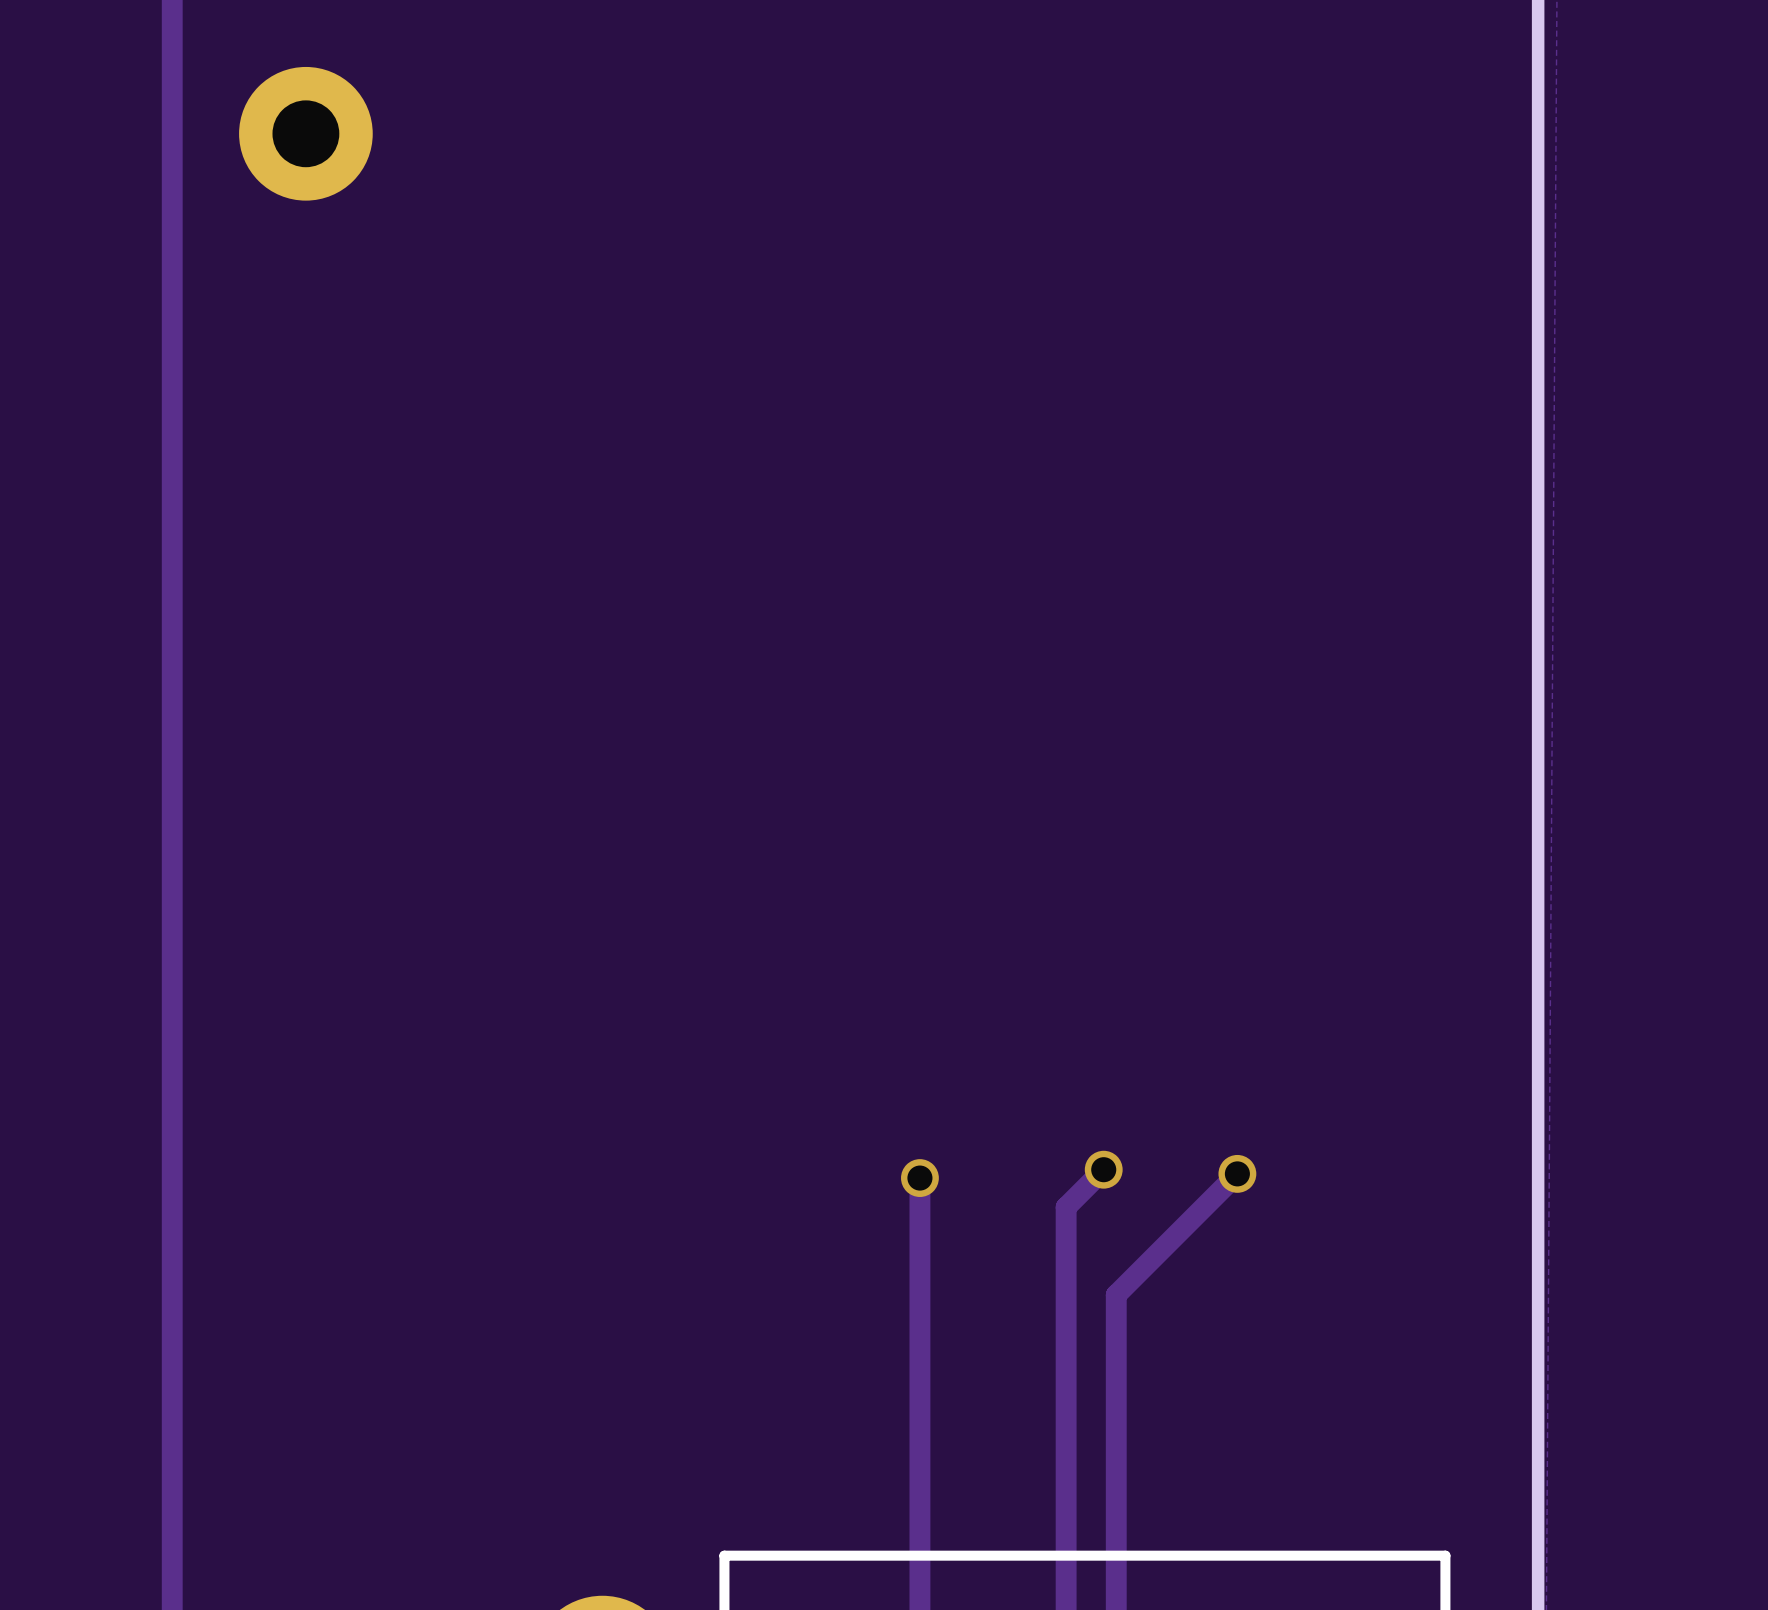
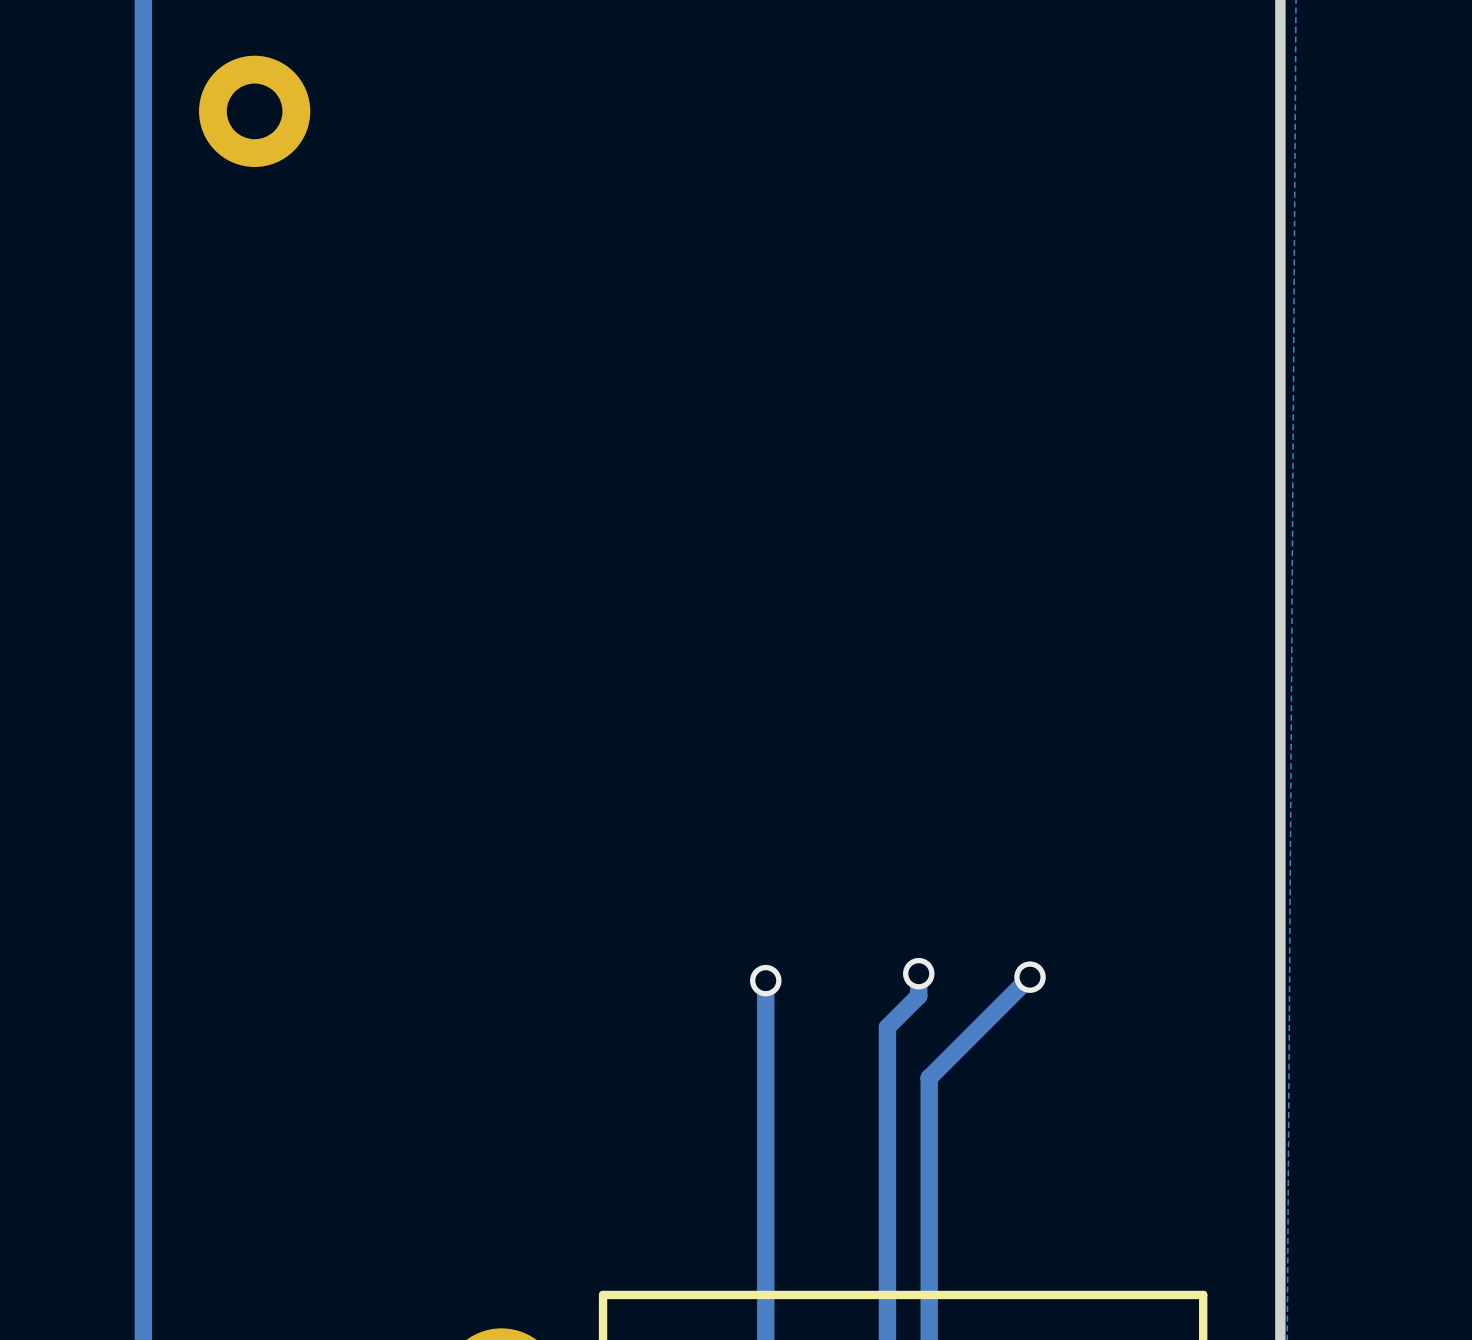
track: (1103, 1169) (1066, 1207) (1066, 1234) -> (918, 973) (918, 995) (887, 1027)

